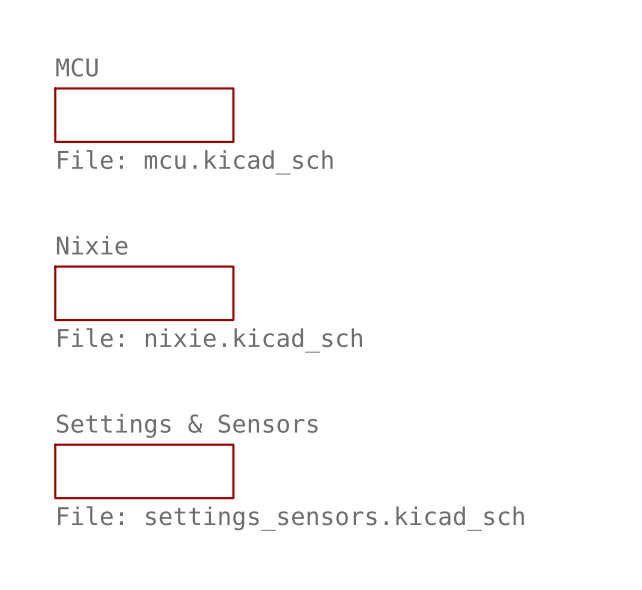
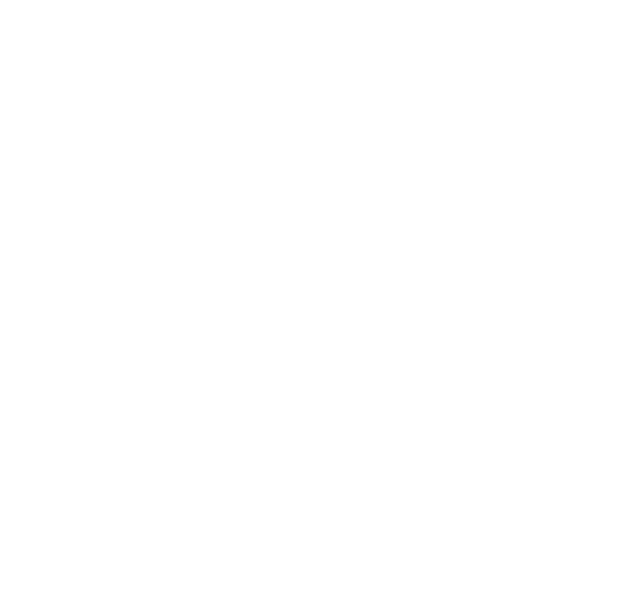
sheet MCU: File: mcu.kicad_sch (144, 115) -> none
sheet Nixie: File: nixie.kicad_sch (144, 293) -> none
sheet Settings & Sensors: File: settings_sensors.kicad_sch (144, 471) -> none

